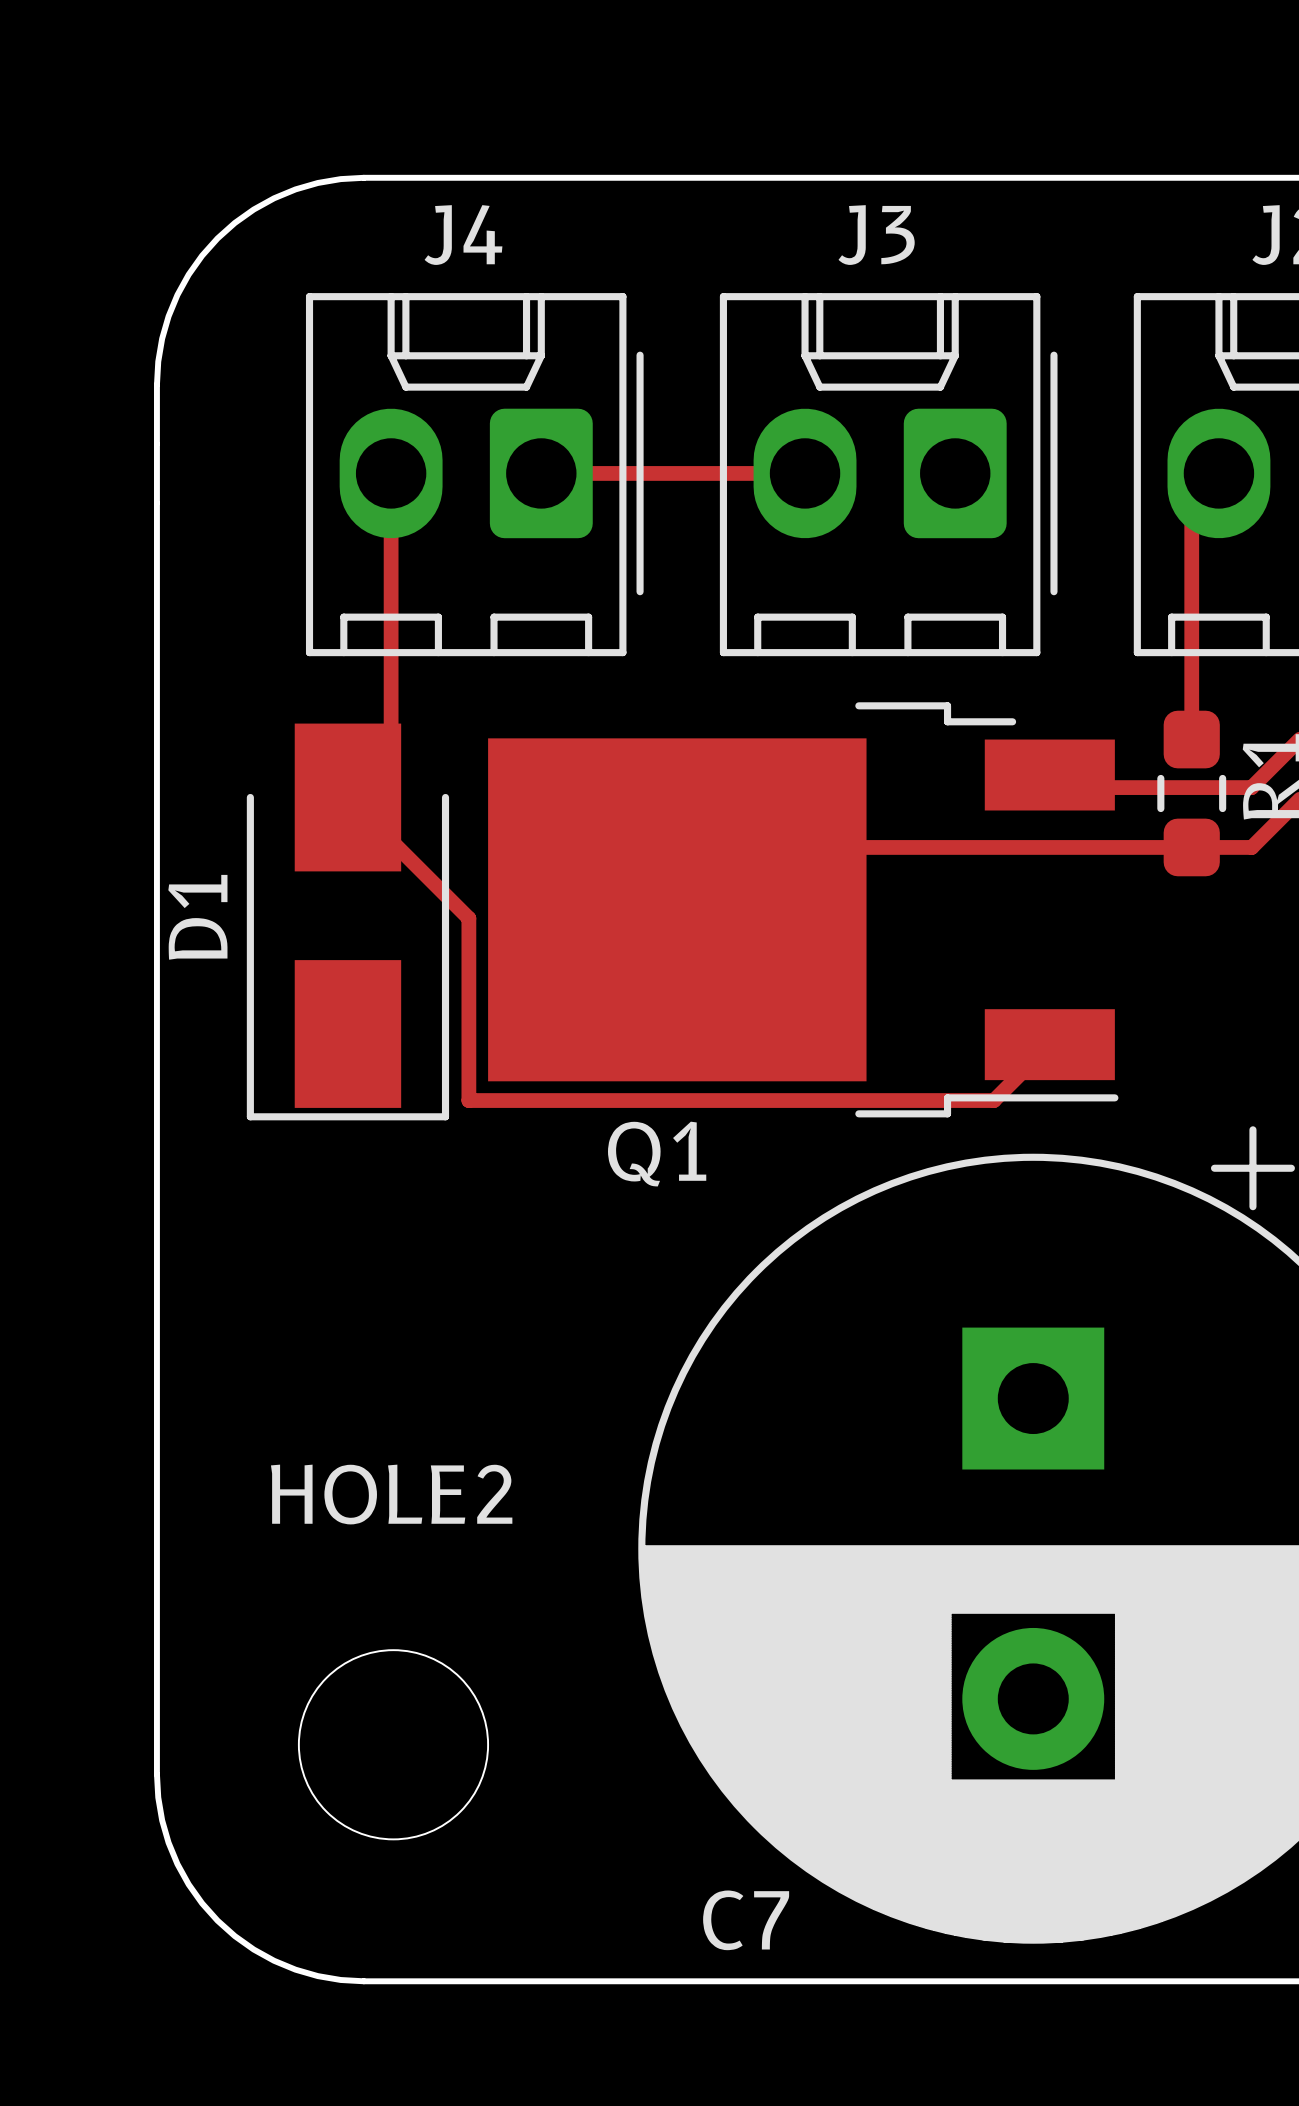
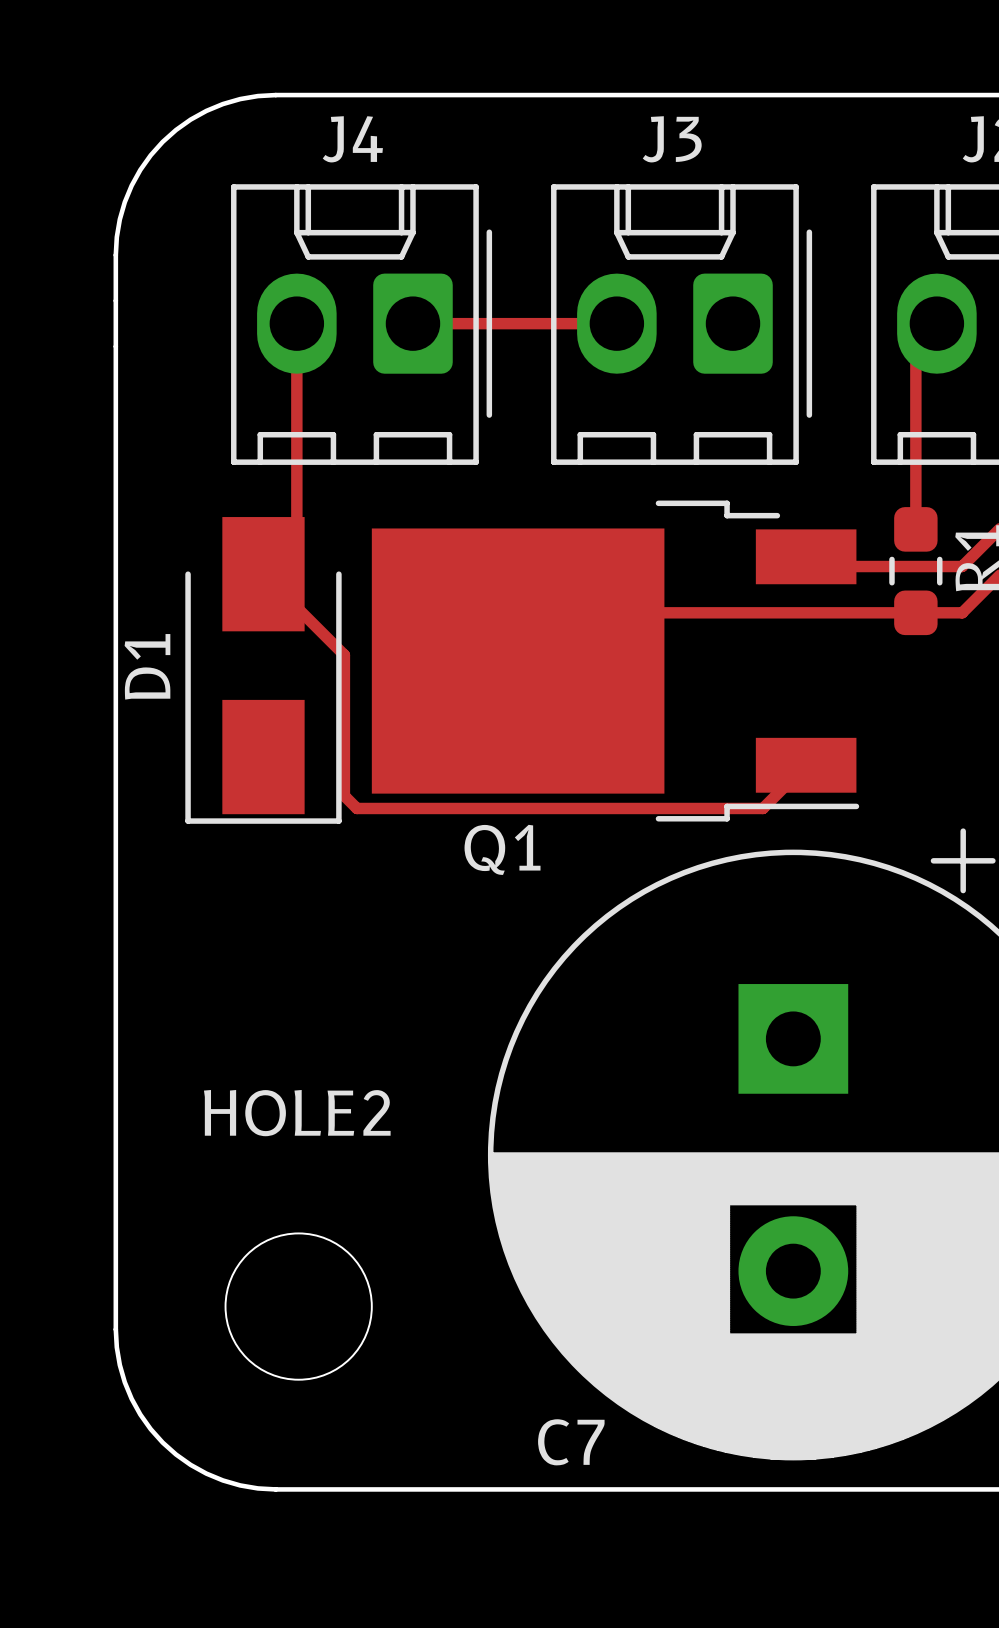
track: (452, 902) (468, 918) (468, 1100) -> (344, 655) (344, 795) (356, 808)

